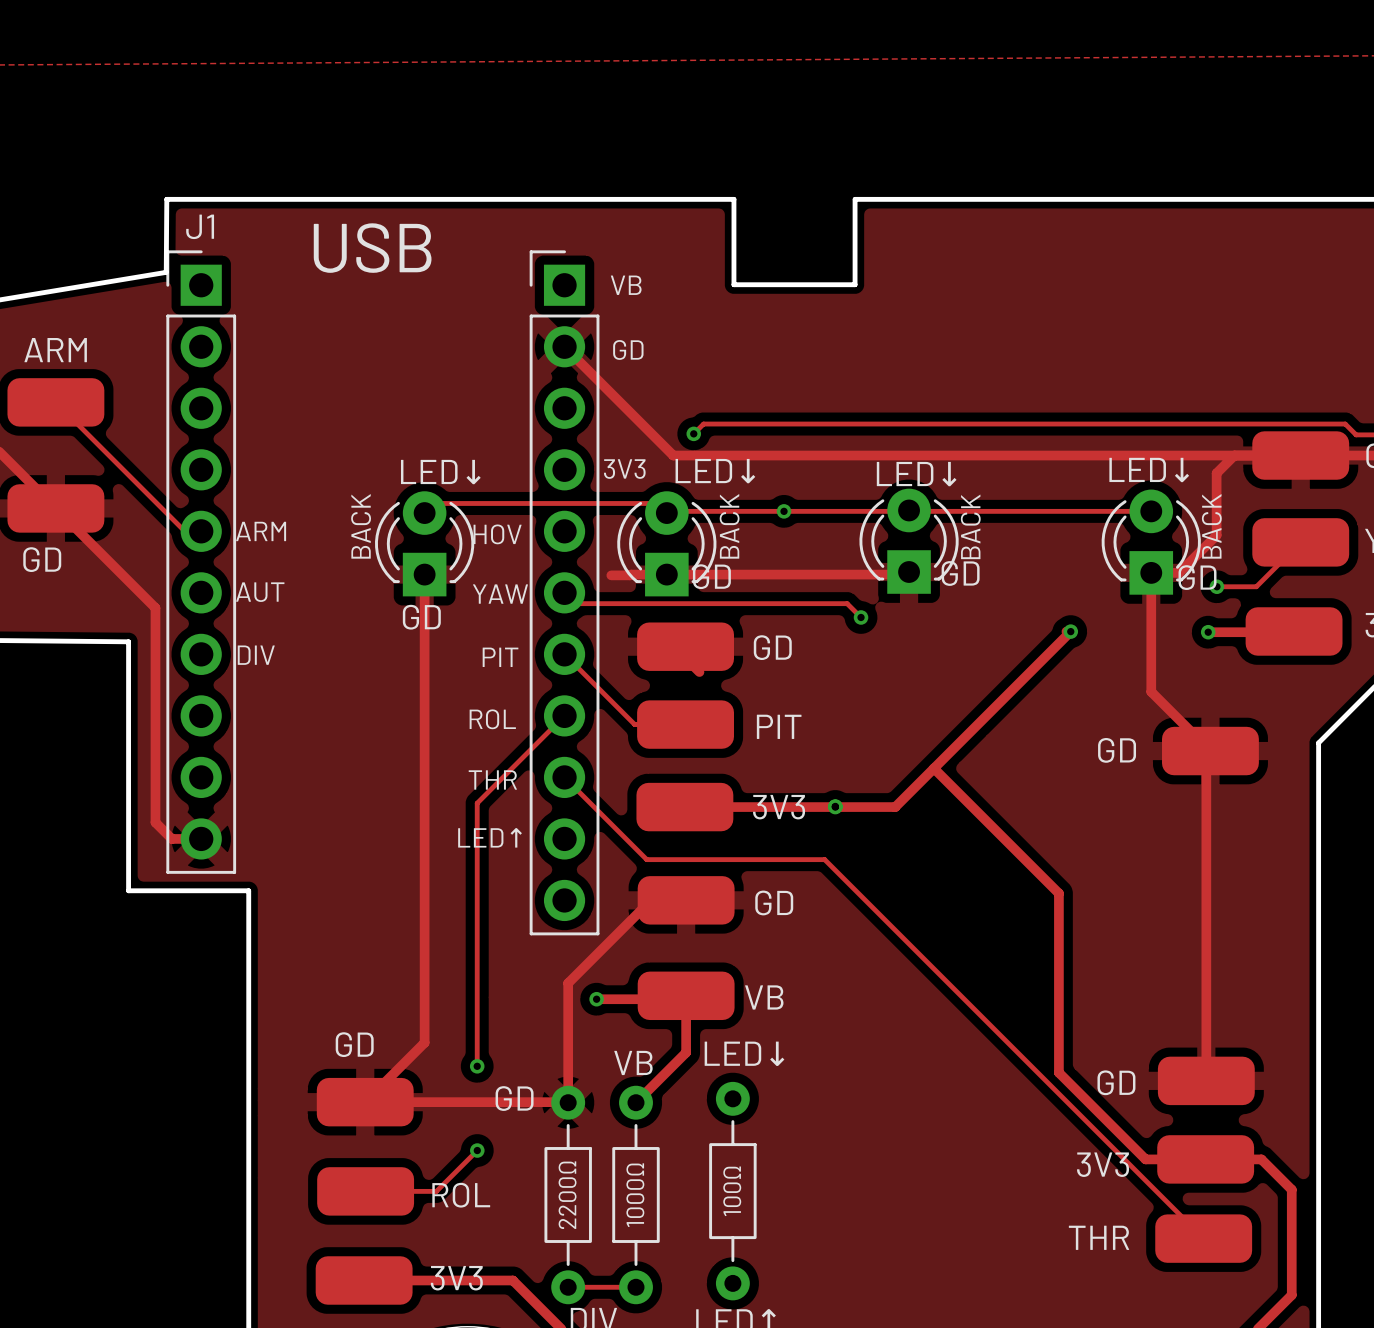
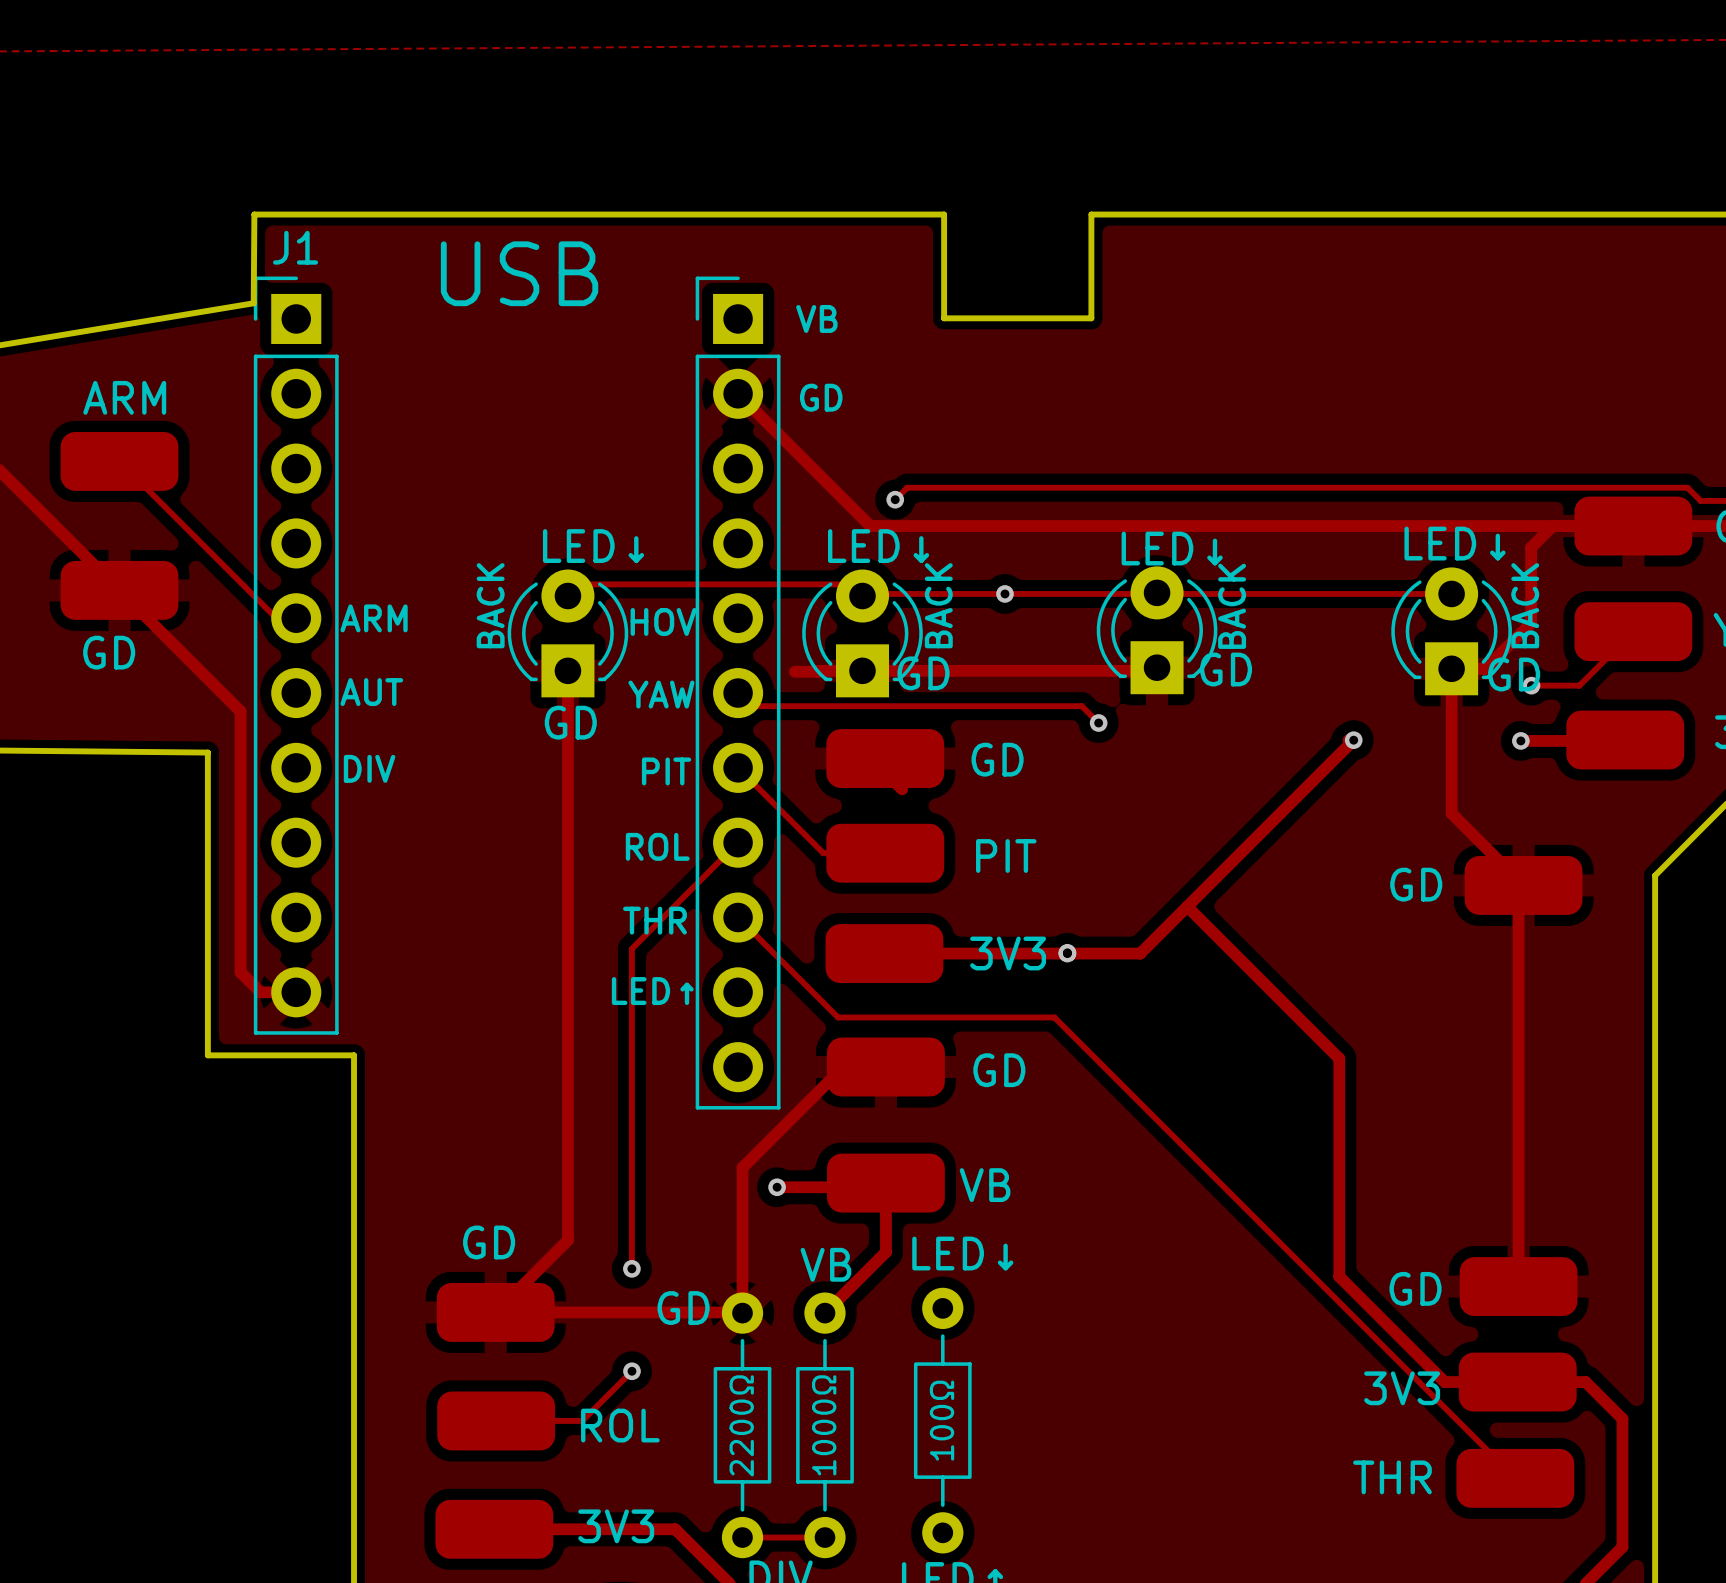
text: 3V3 (624, 469) -> none
text position: LED↓ (715, 471) -> LED↓ (878, 546)

